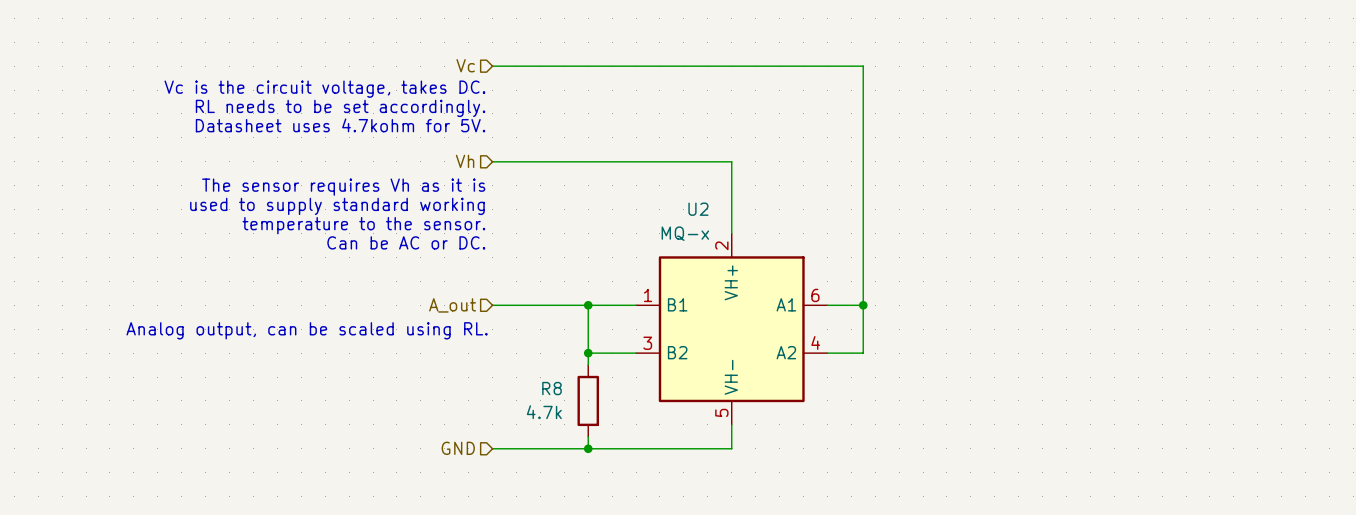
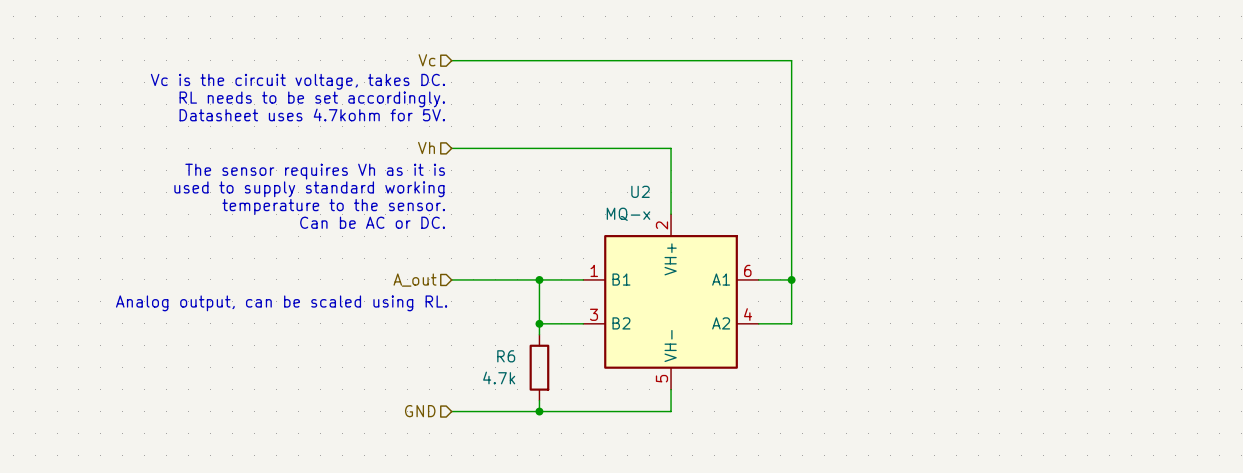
R8 name: R8 (552, 388) -> R6 (506, 356)

